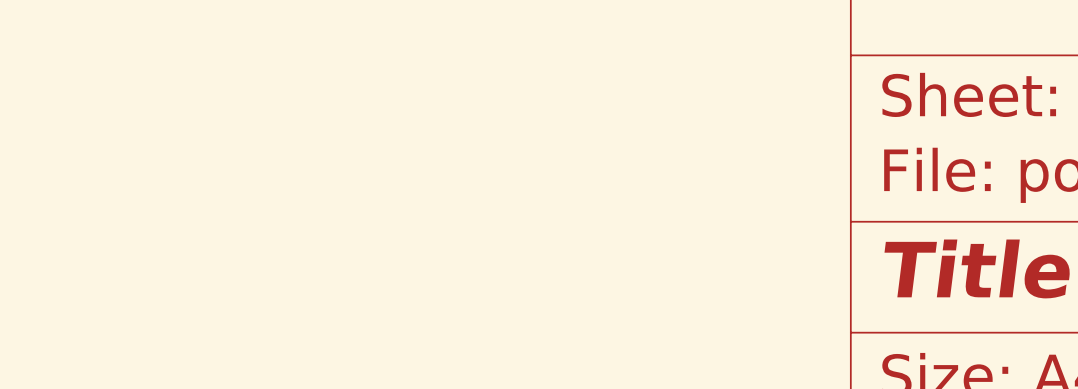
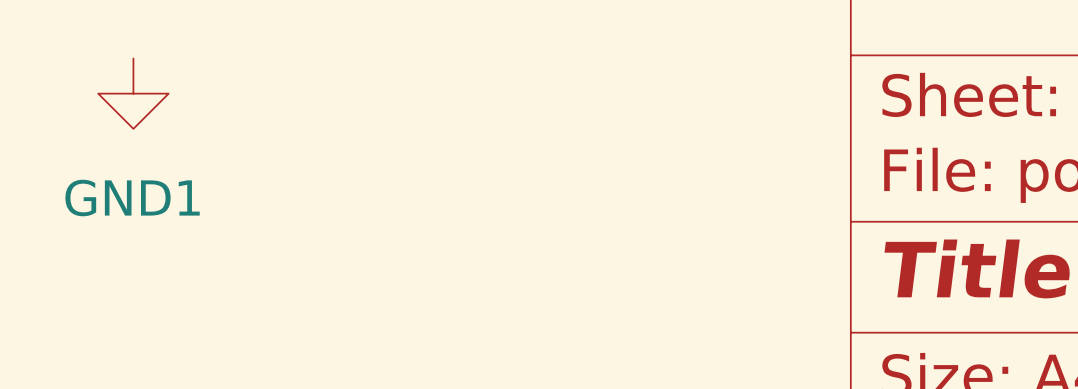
power symbol: none -> GND1 (133, 93)

